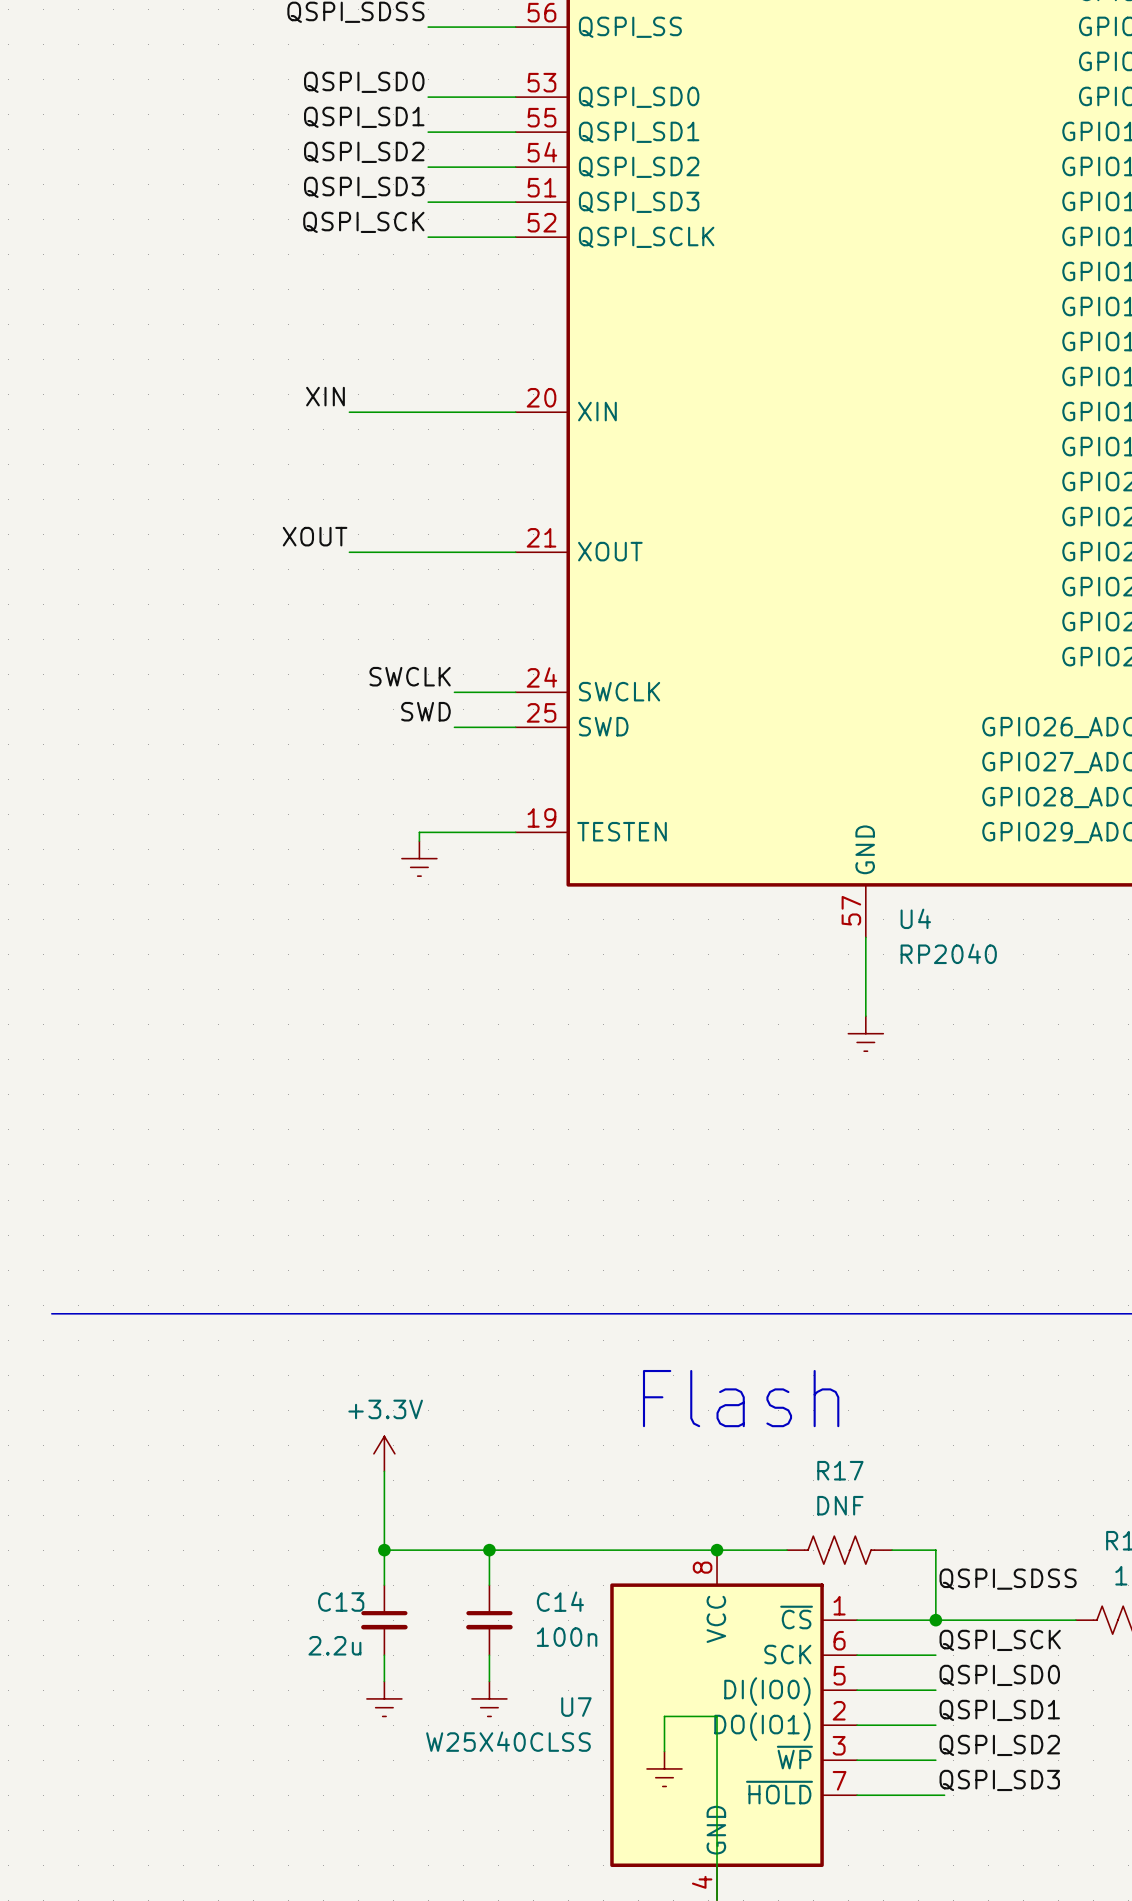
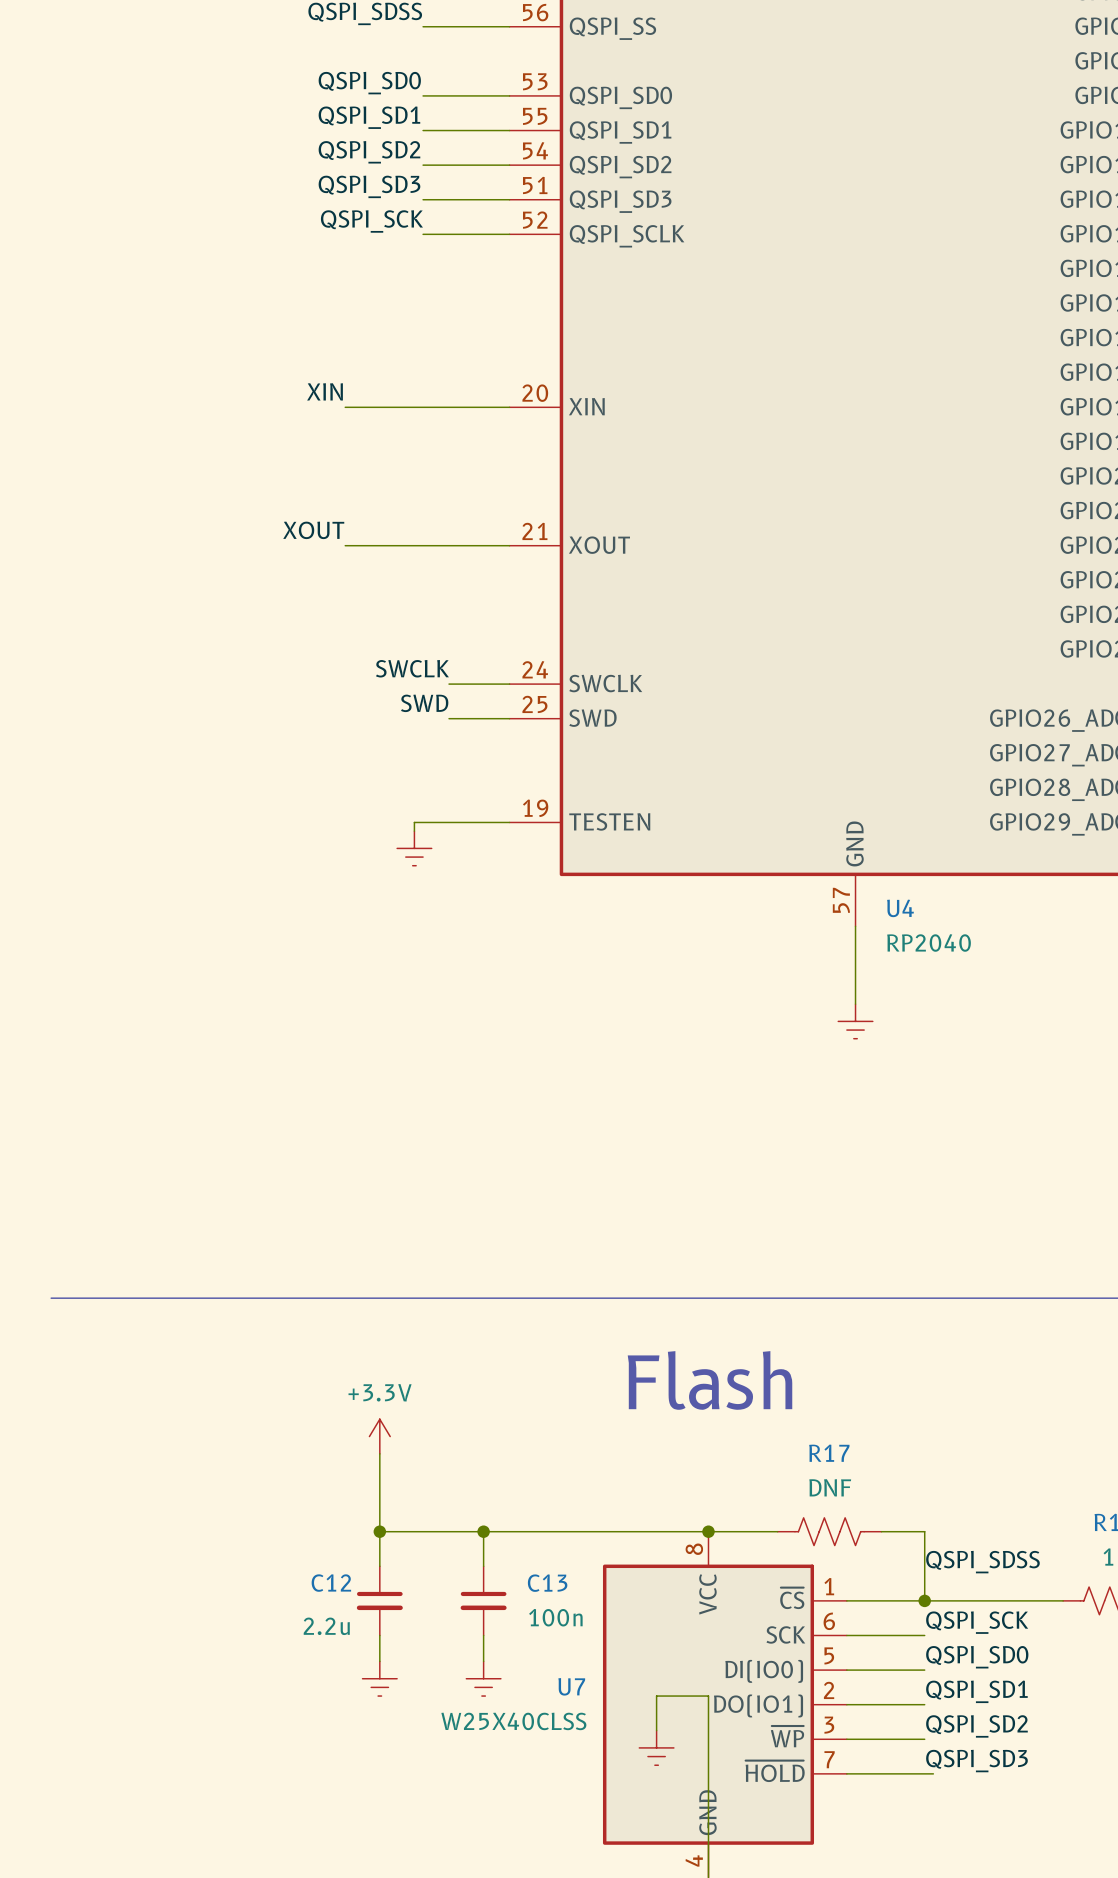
C14 name: C14 (560, 1601) -> C13 (547, 1583)
C13 name: C13 (341, 1602) -> C12 (331, 1583)

